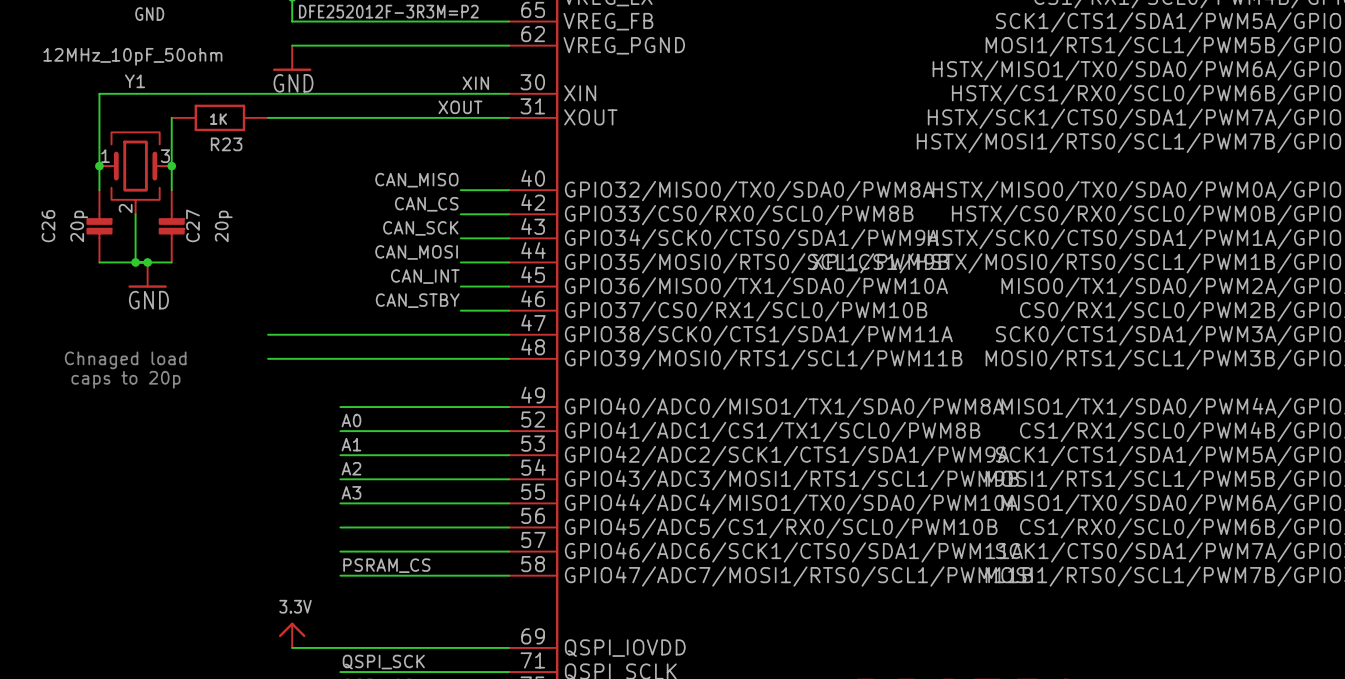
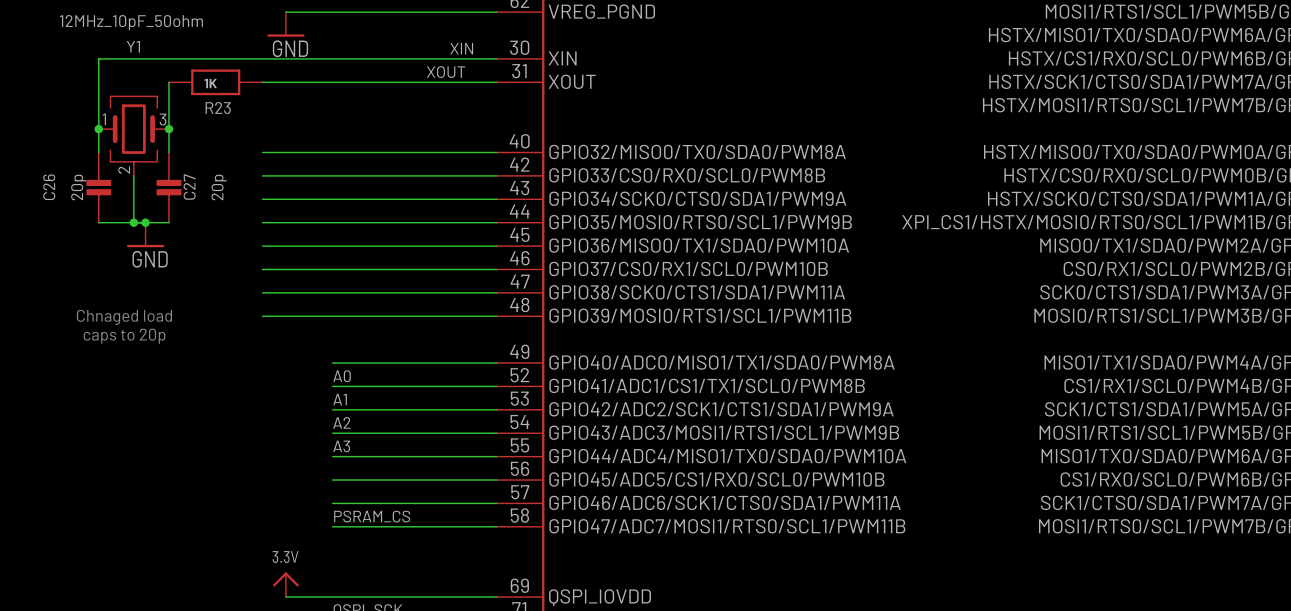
label: CAN_MISO (416, 180) -> none
wire: none -> (262, 152) (449, 152)
label: CAN_CS (426, 204) -> none
wire: none -> (262, 175) (449, 175)
label: CAN_SCK (420, 228) -> none
wire: none -> (262, 199) (449, 199)
label: CAN_MOSI (416, 252) -> none
wire: none -> (262, 222) (449, 222)
label: CAN_INT (425, 276) -> none
wire: none -> (262, 246) (449, 246)
label: CAN_STBY (417, 300) -> none
wire: none -> (262, 269) (449, 269)

